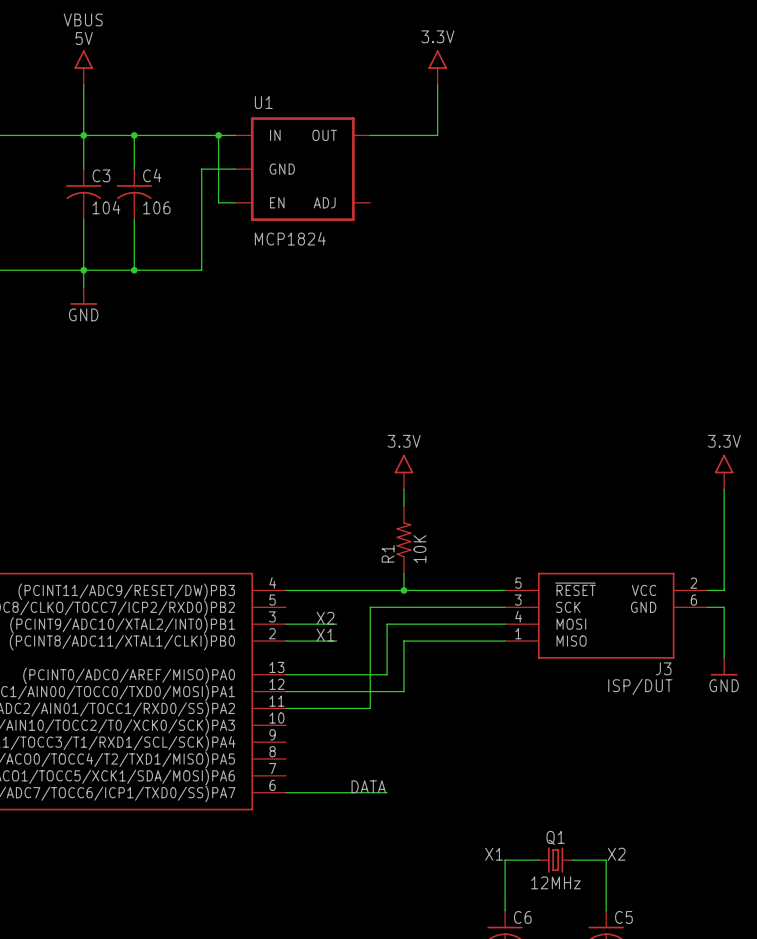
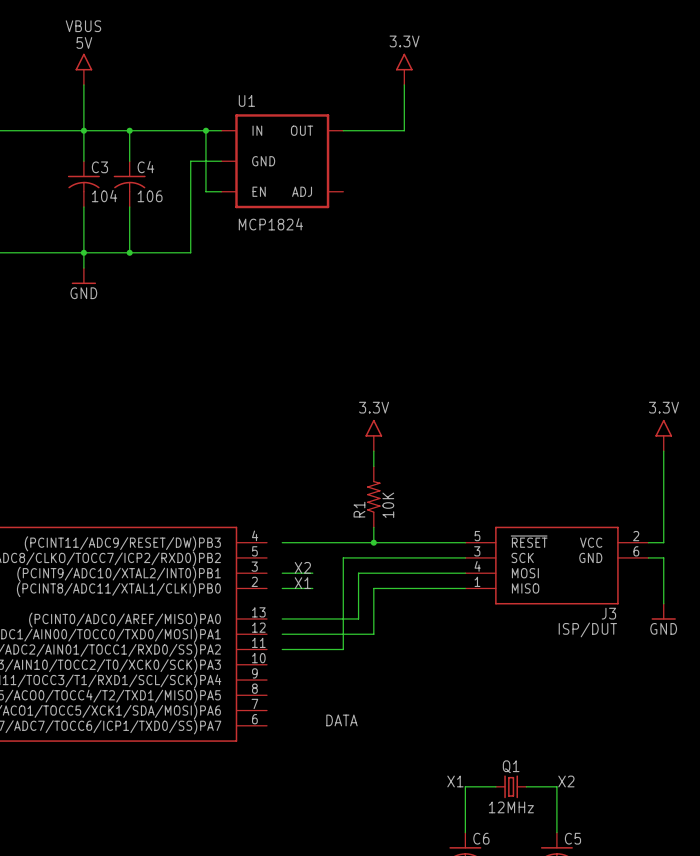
wire: (285, 590) (302, 590) -> none
wire: (285, 624) (302, 624) -> none
wire: (285, 641) (302, 641) -> none
wire: (285, 674) (302, 674) -> none
wire: (285, 691) (302, 691) -> none
wire: (285, 708) (302, 708) -> none
wire: (285, 792) (387, 792) -> none

